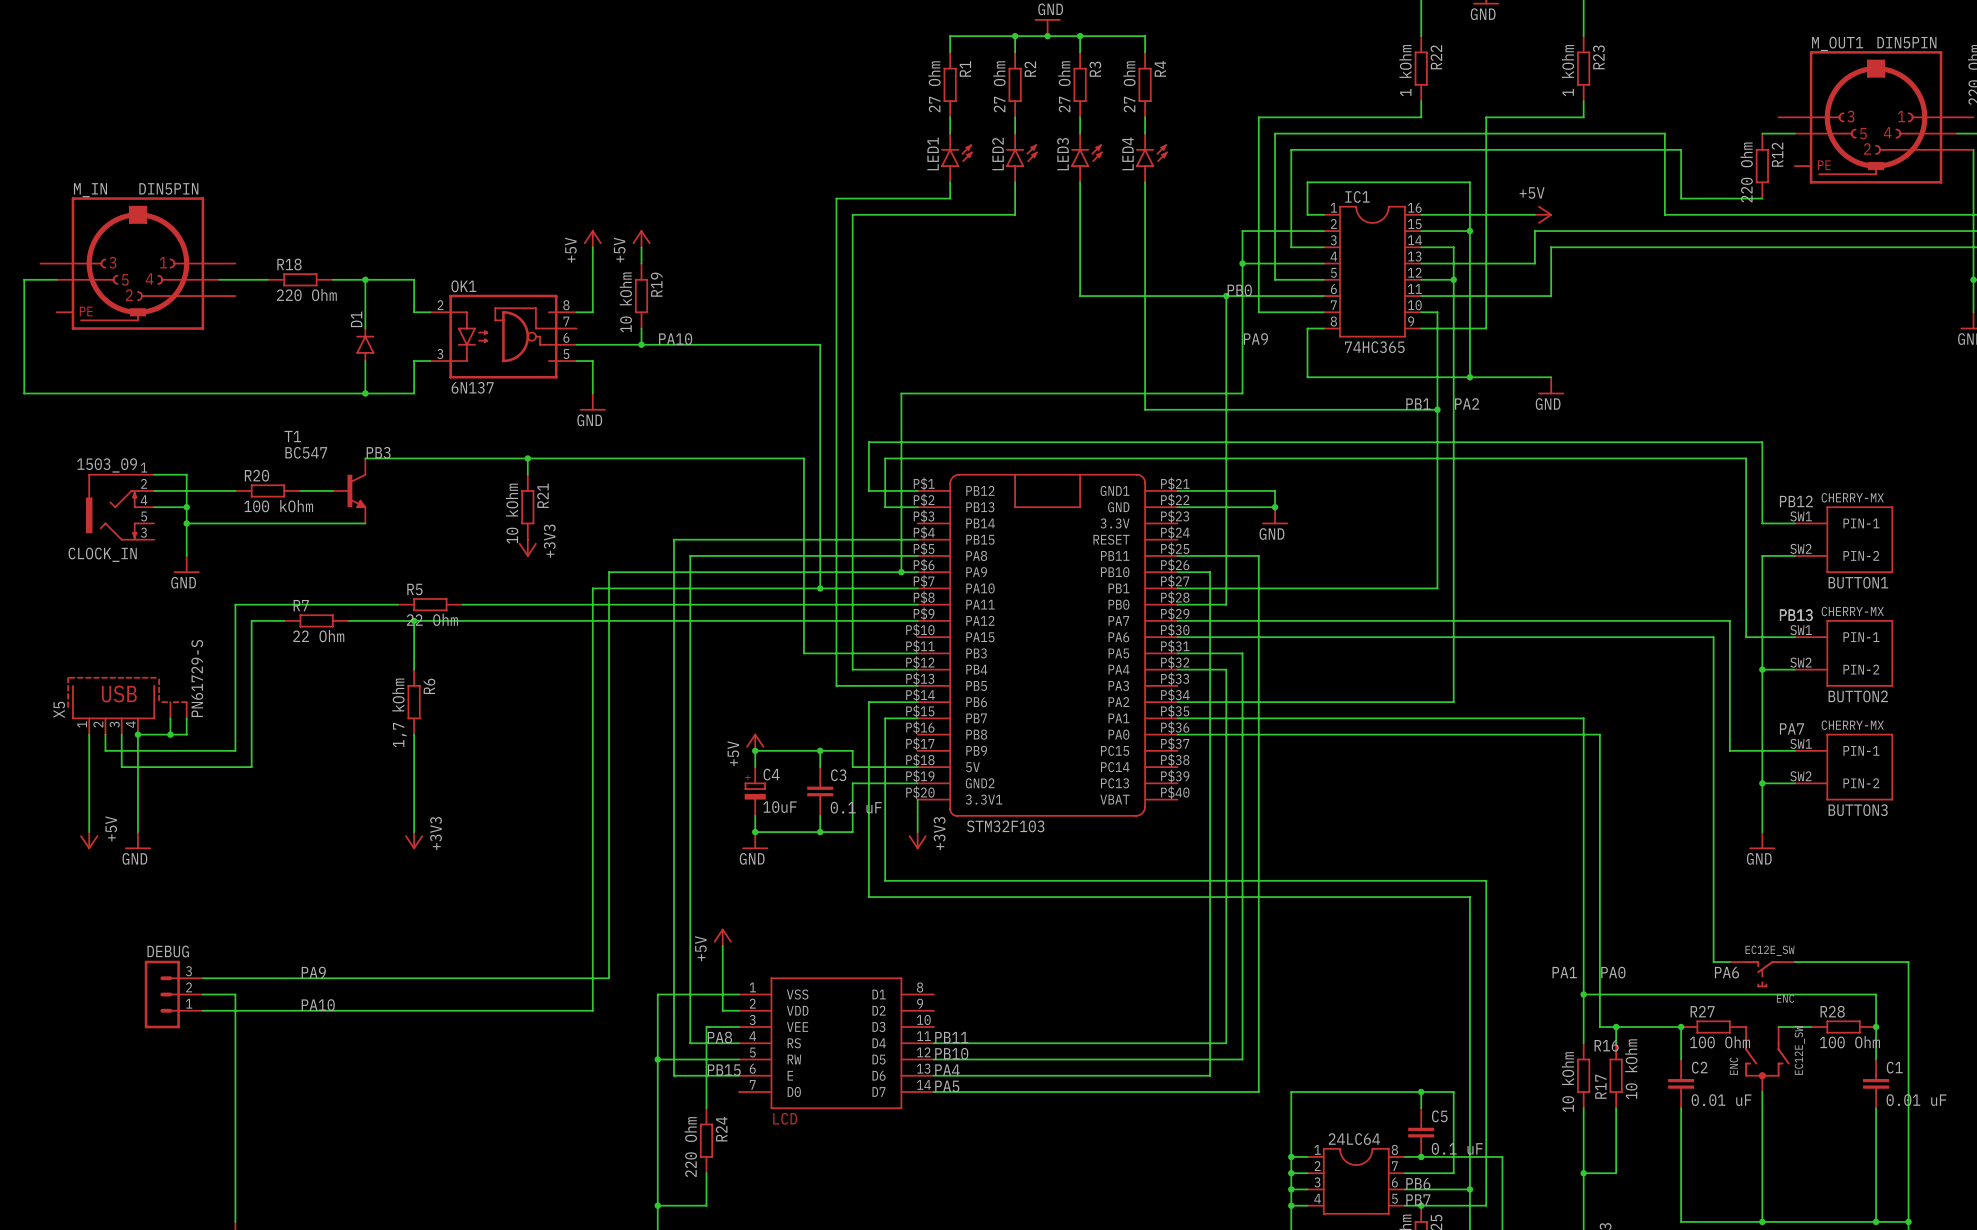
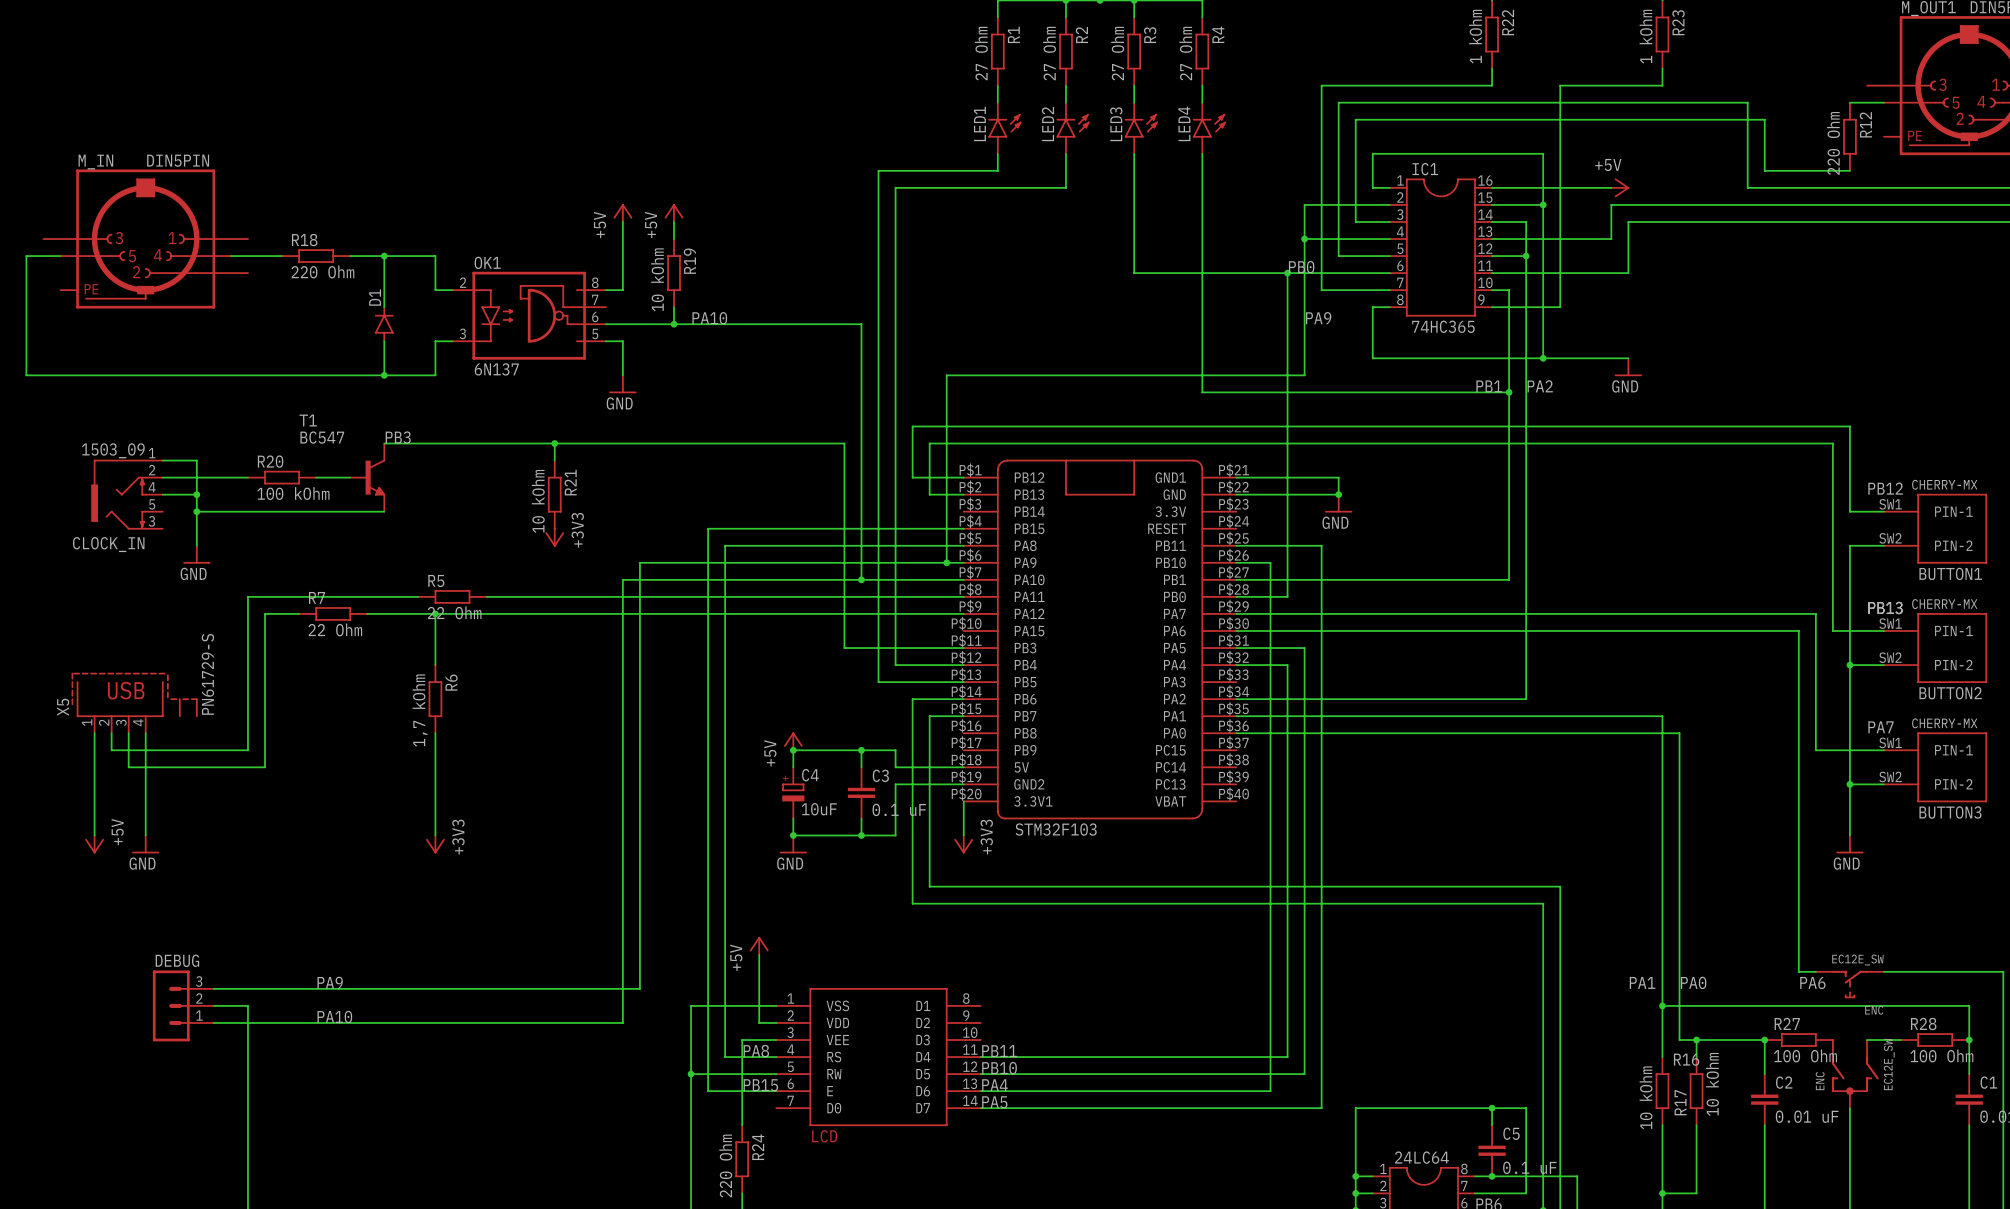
wire: (170, 718) (170, 734) -> none
wire: (186, 718) (186, 734) (137, 734) -> none
junction: (137, 734) -> none
junction: (170, 734) -> none

